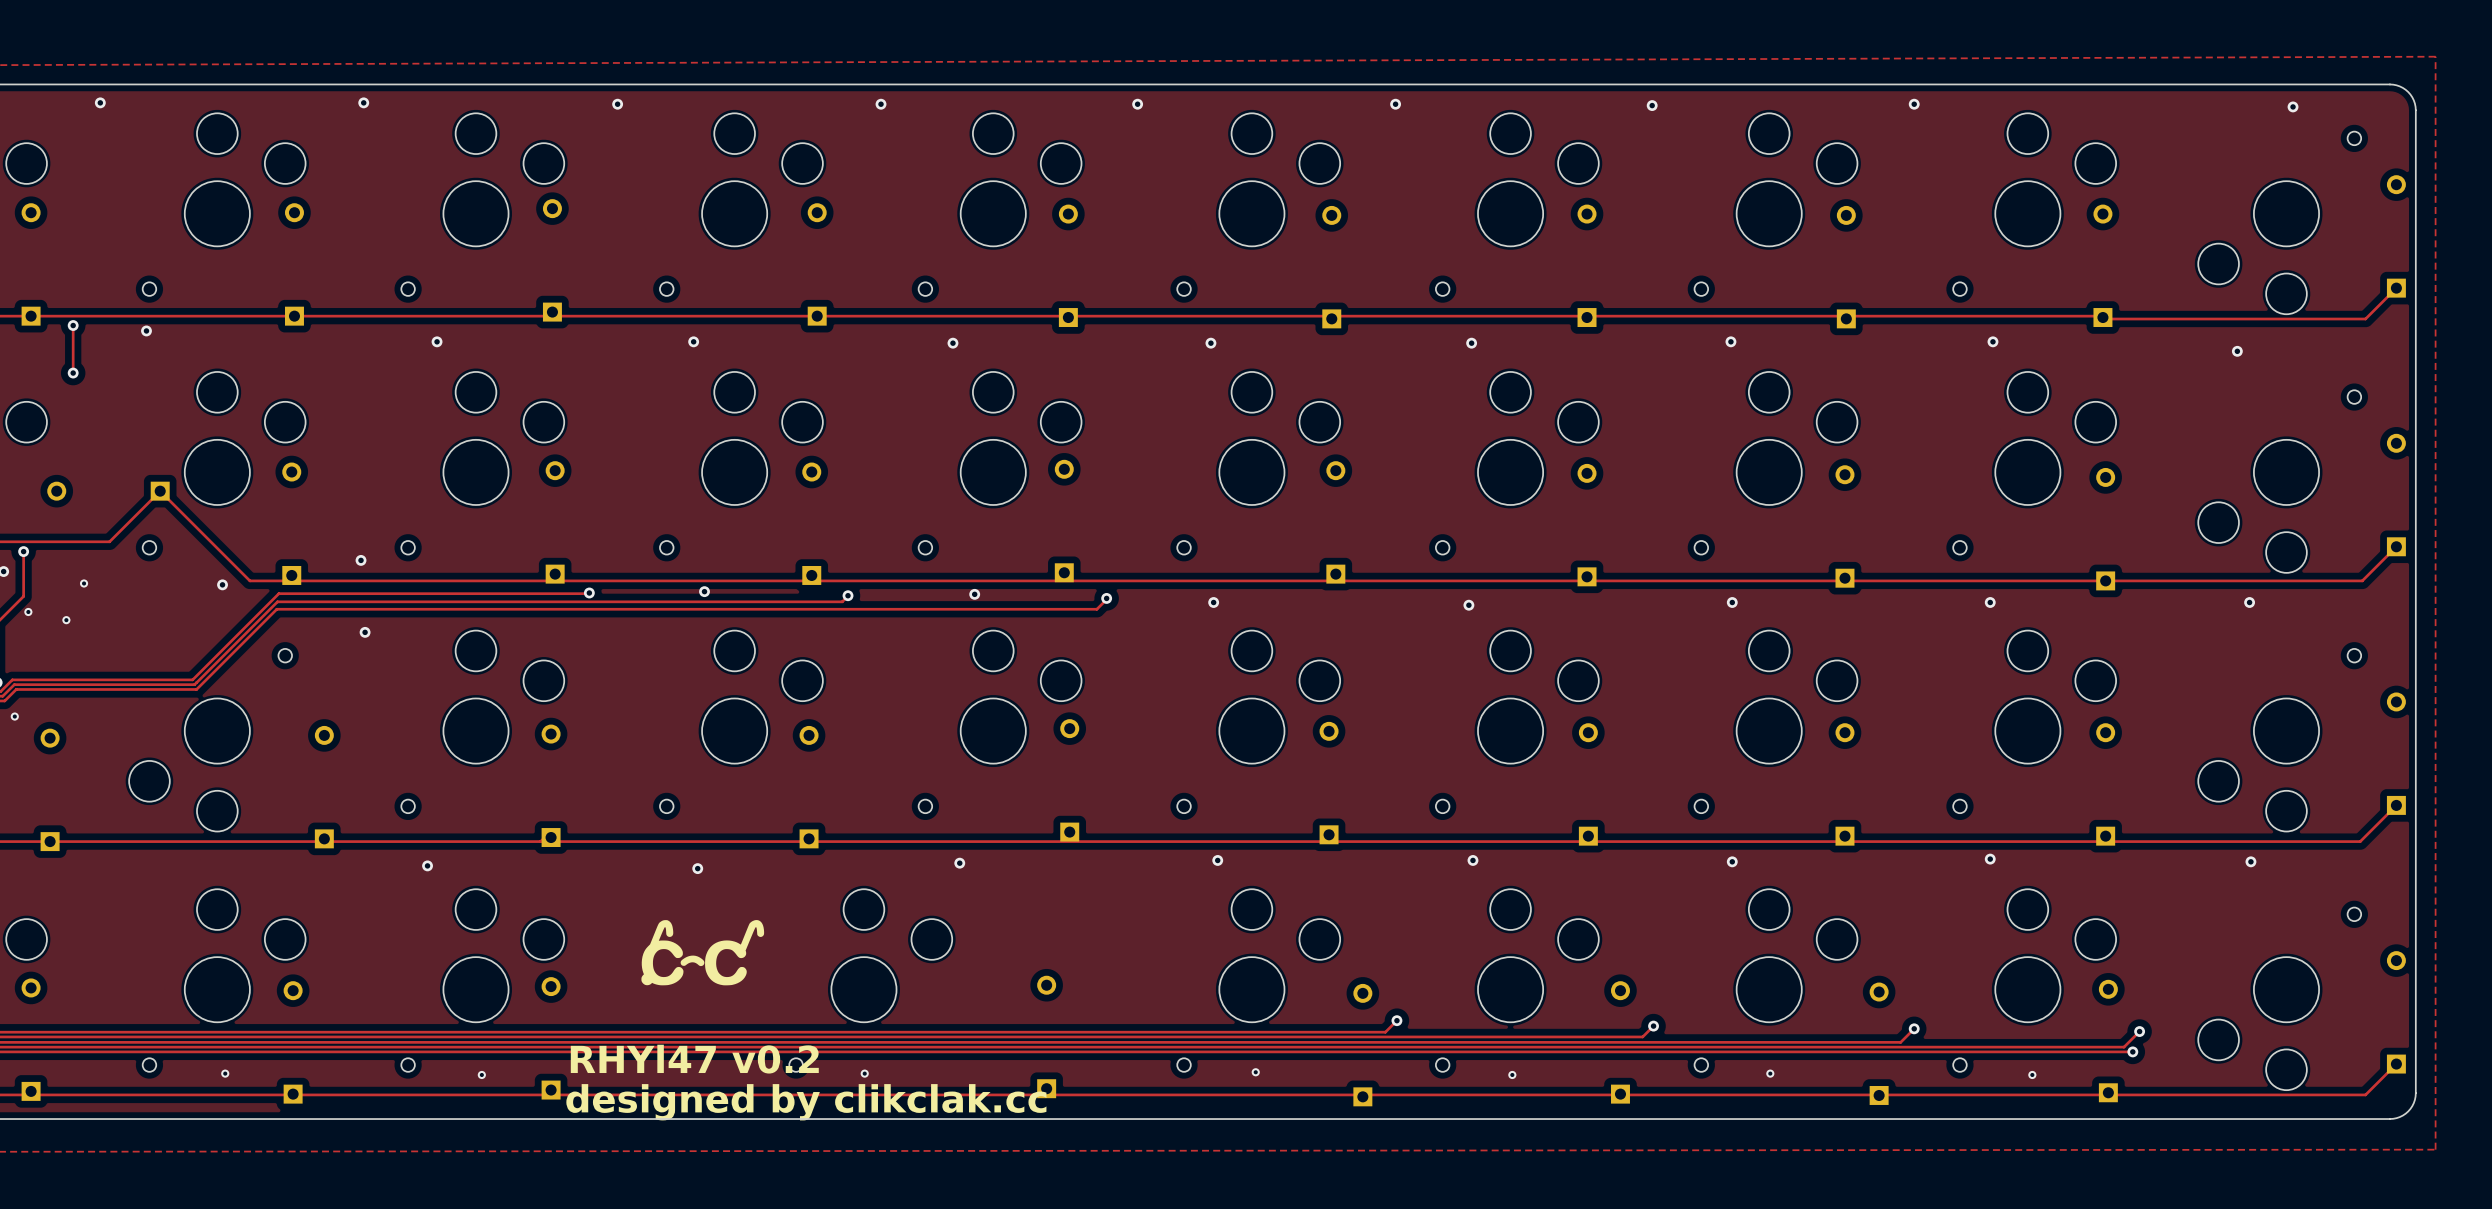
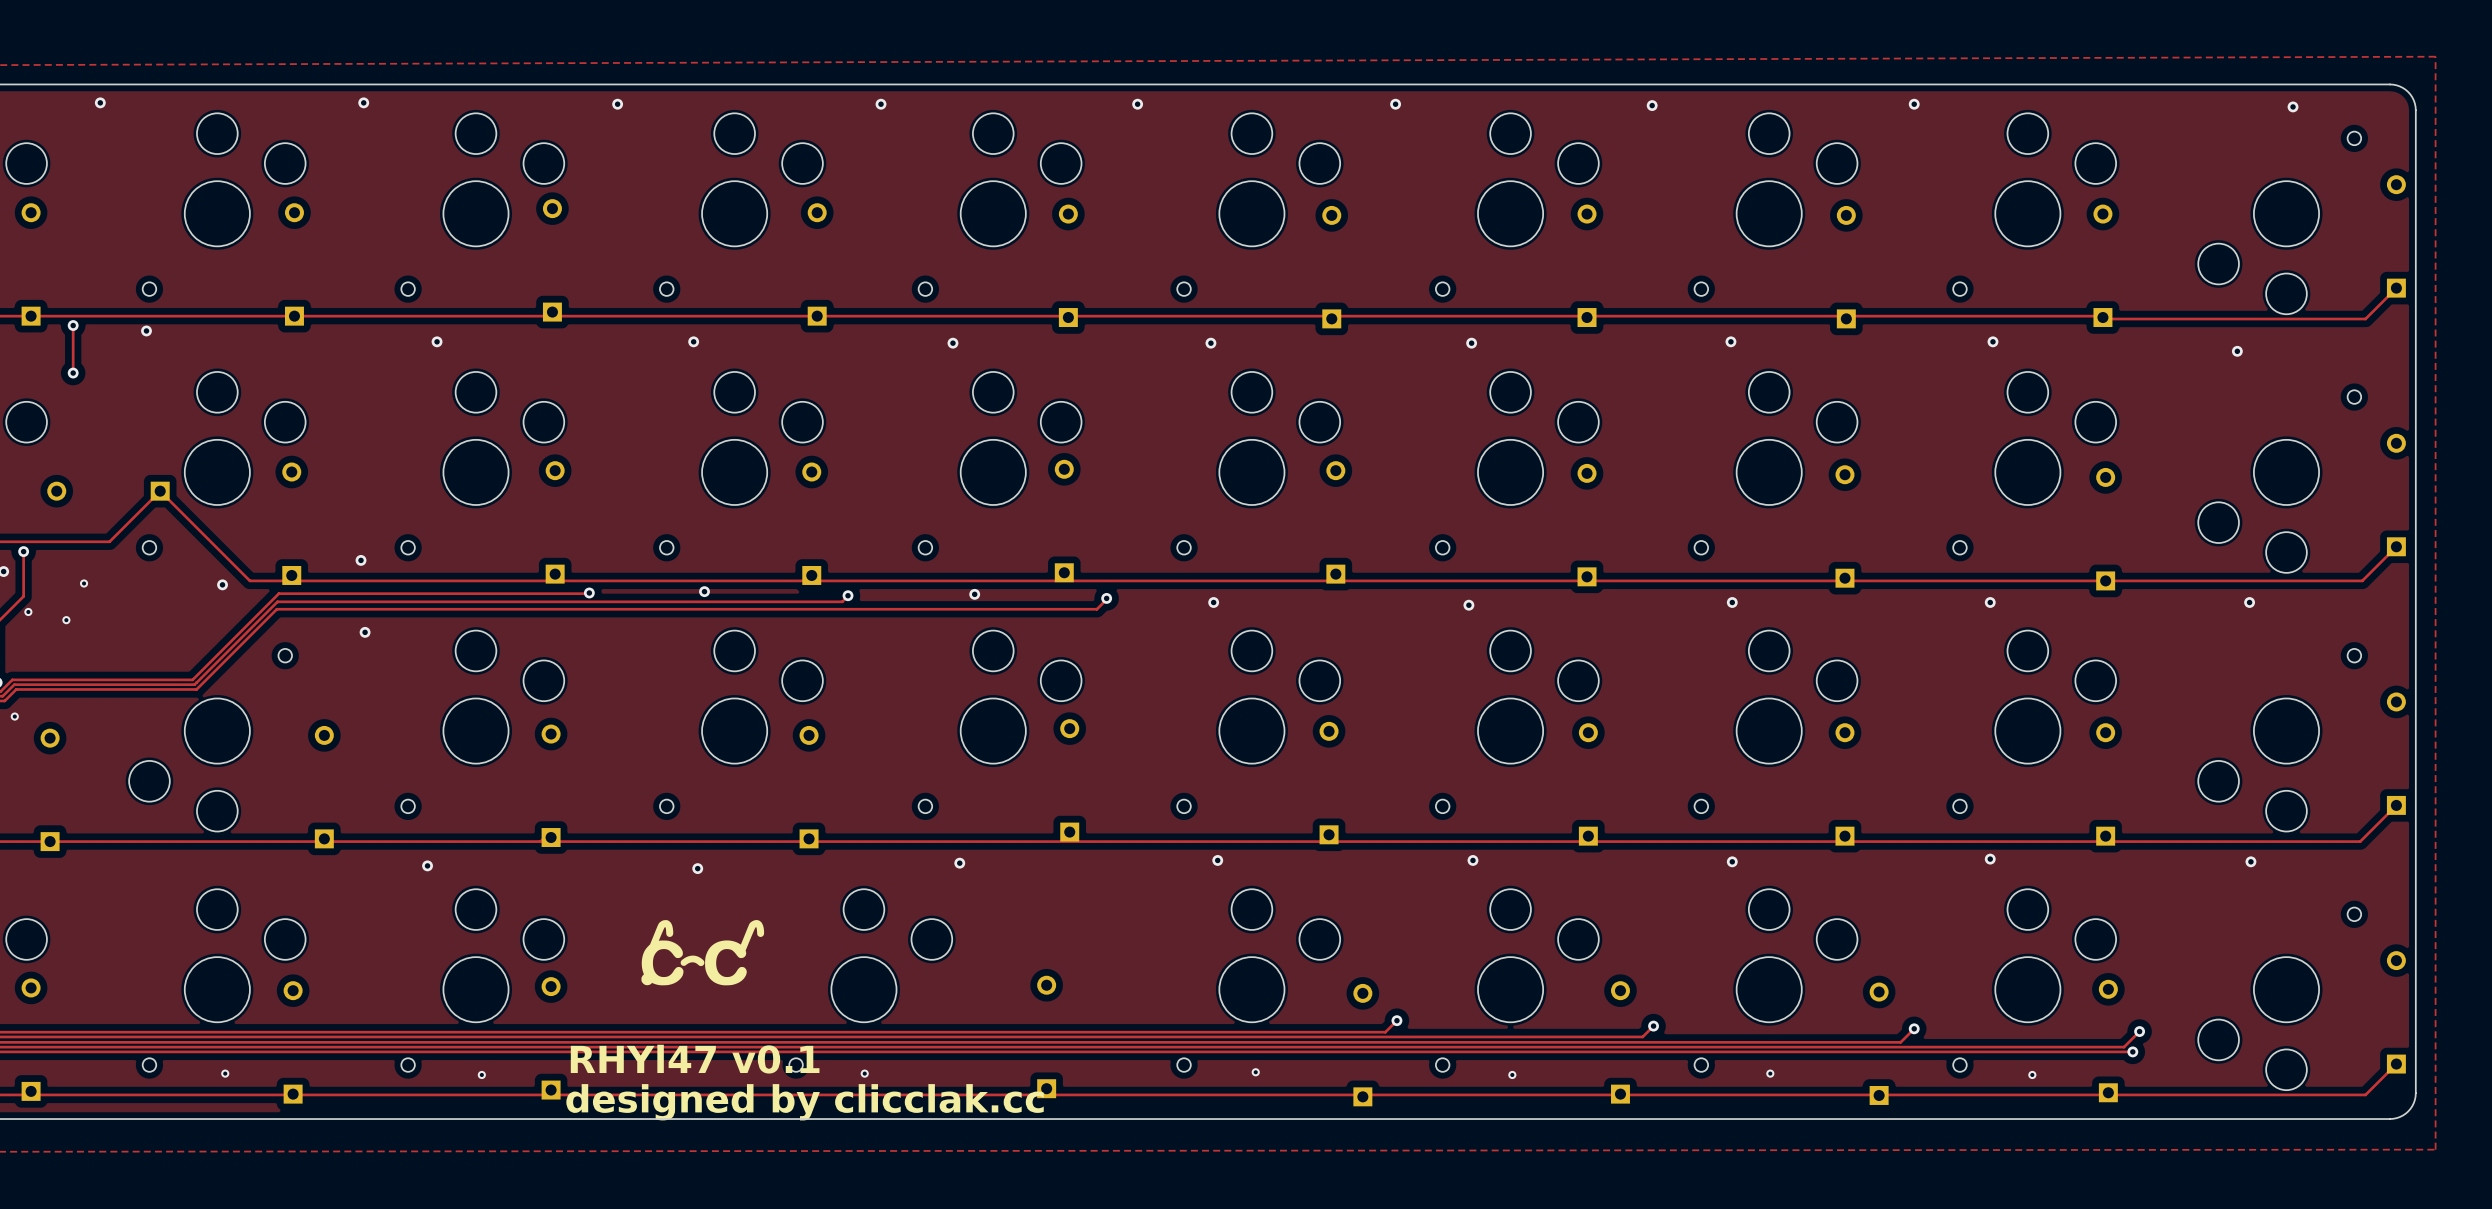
text: RHYl47 v0.2 (694, 1059) -> RHYl47 v0.1 (695, 1059)
text: designed by clikclak.cc (806, 1102) -> designed by clicclak.cc (805, 1102)

